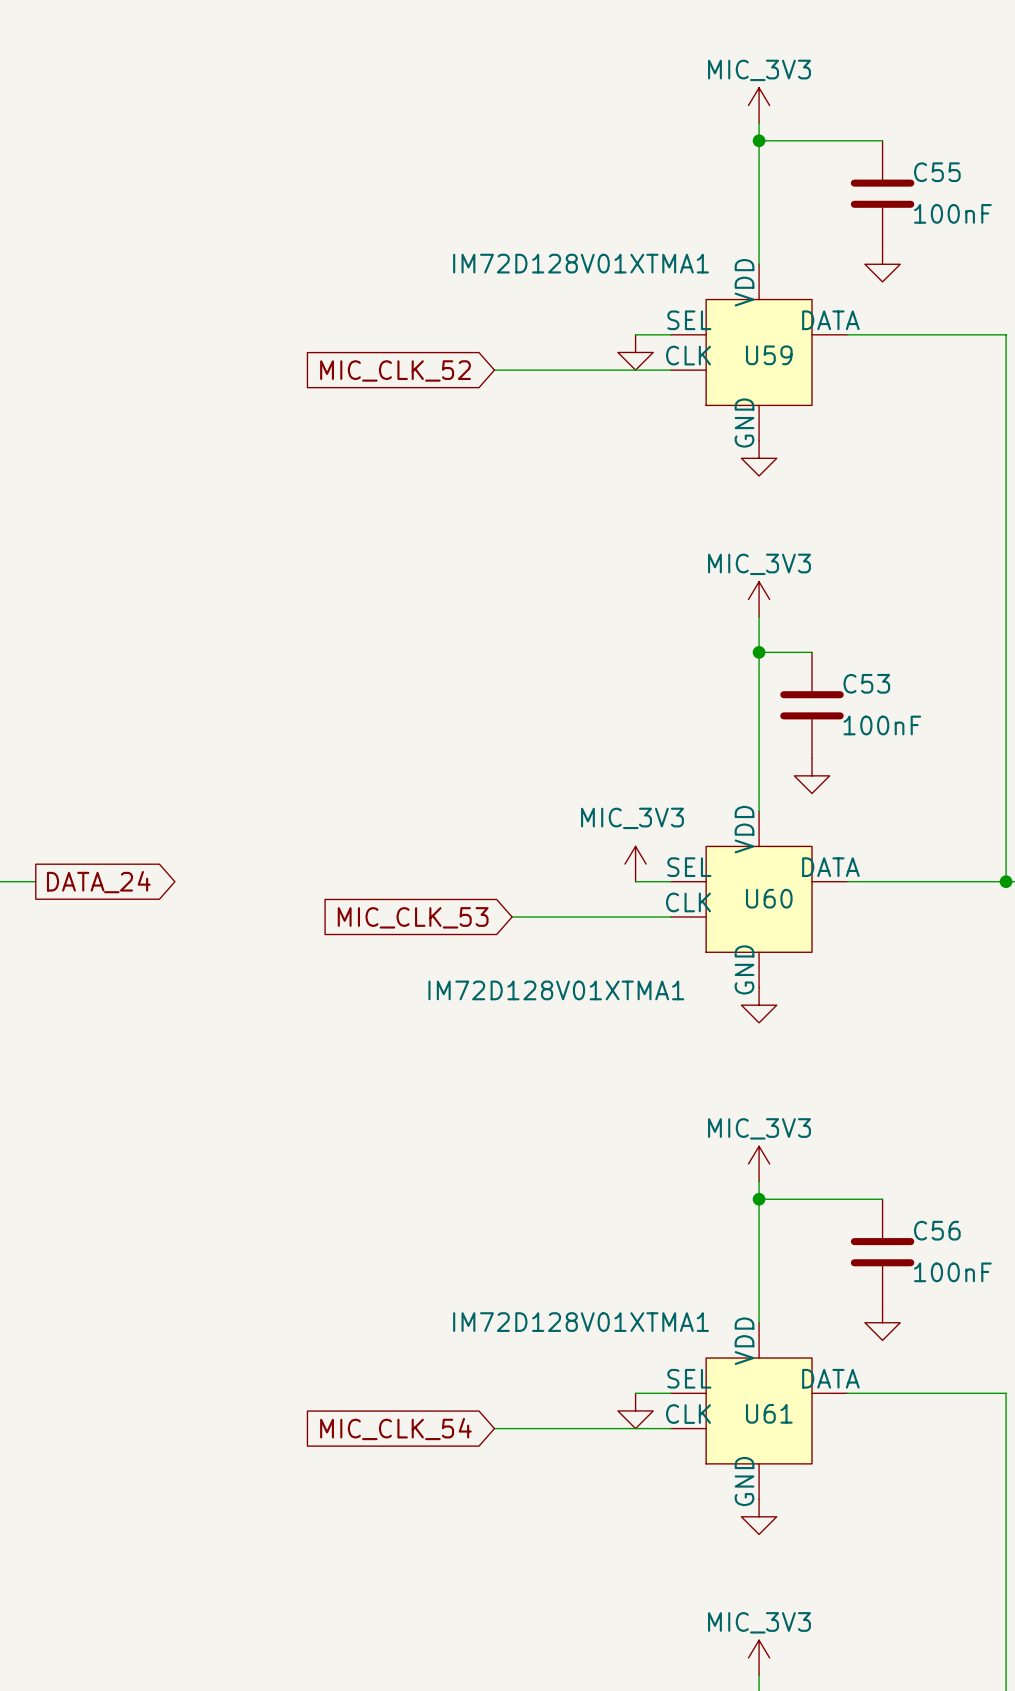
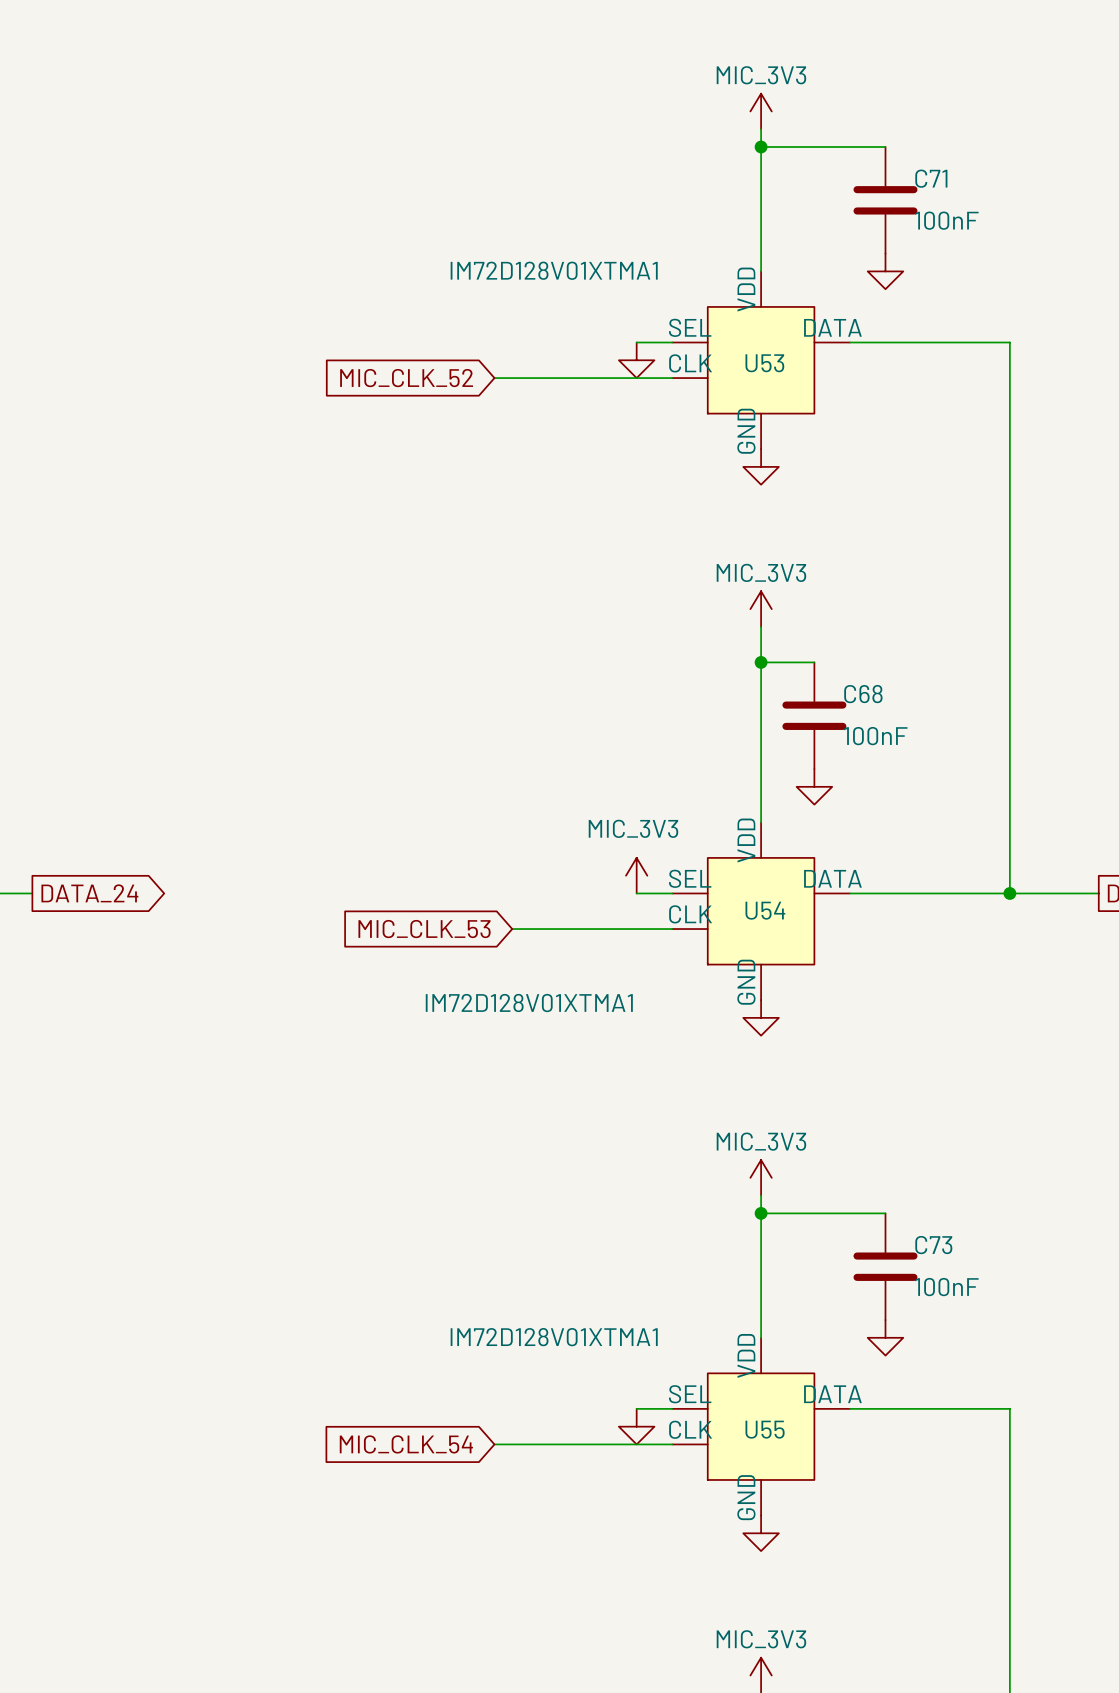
C55 name: C55 (937, 172) -> C71 (931, 178)
U59 name: U59 (769, 355) -> U53 (764, 363)
C53 name: C53 (866, 683) -> C68 (863, 694)
U60 name: U60 (769, 898) -> U54 (765, 910)
C56 name: C56 (937, 1230) -> C73 (933, 1245)
U61 name: U61 (769, 1413) -> U55 (765, 1429)

